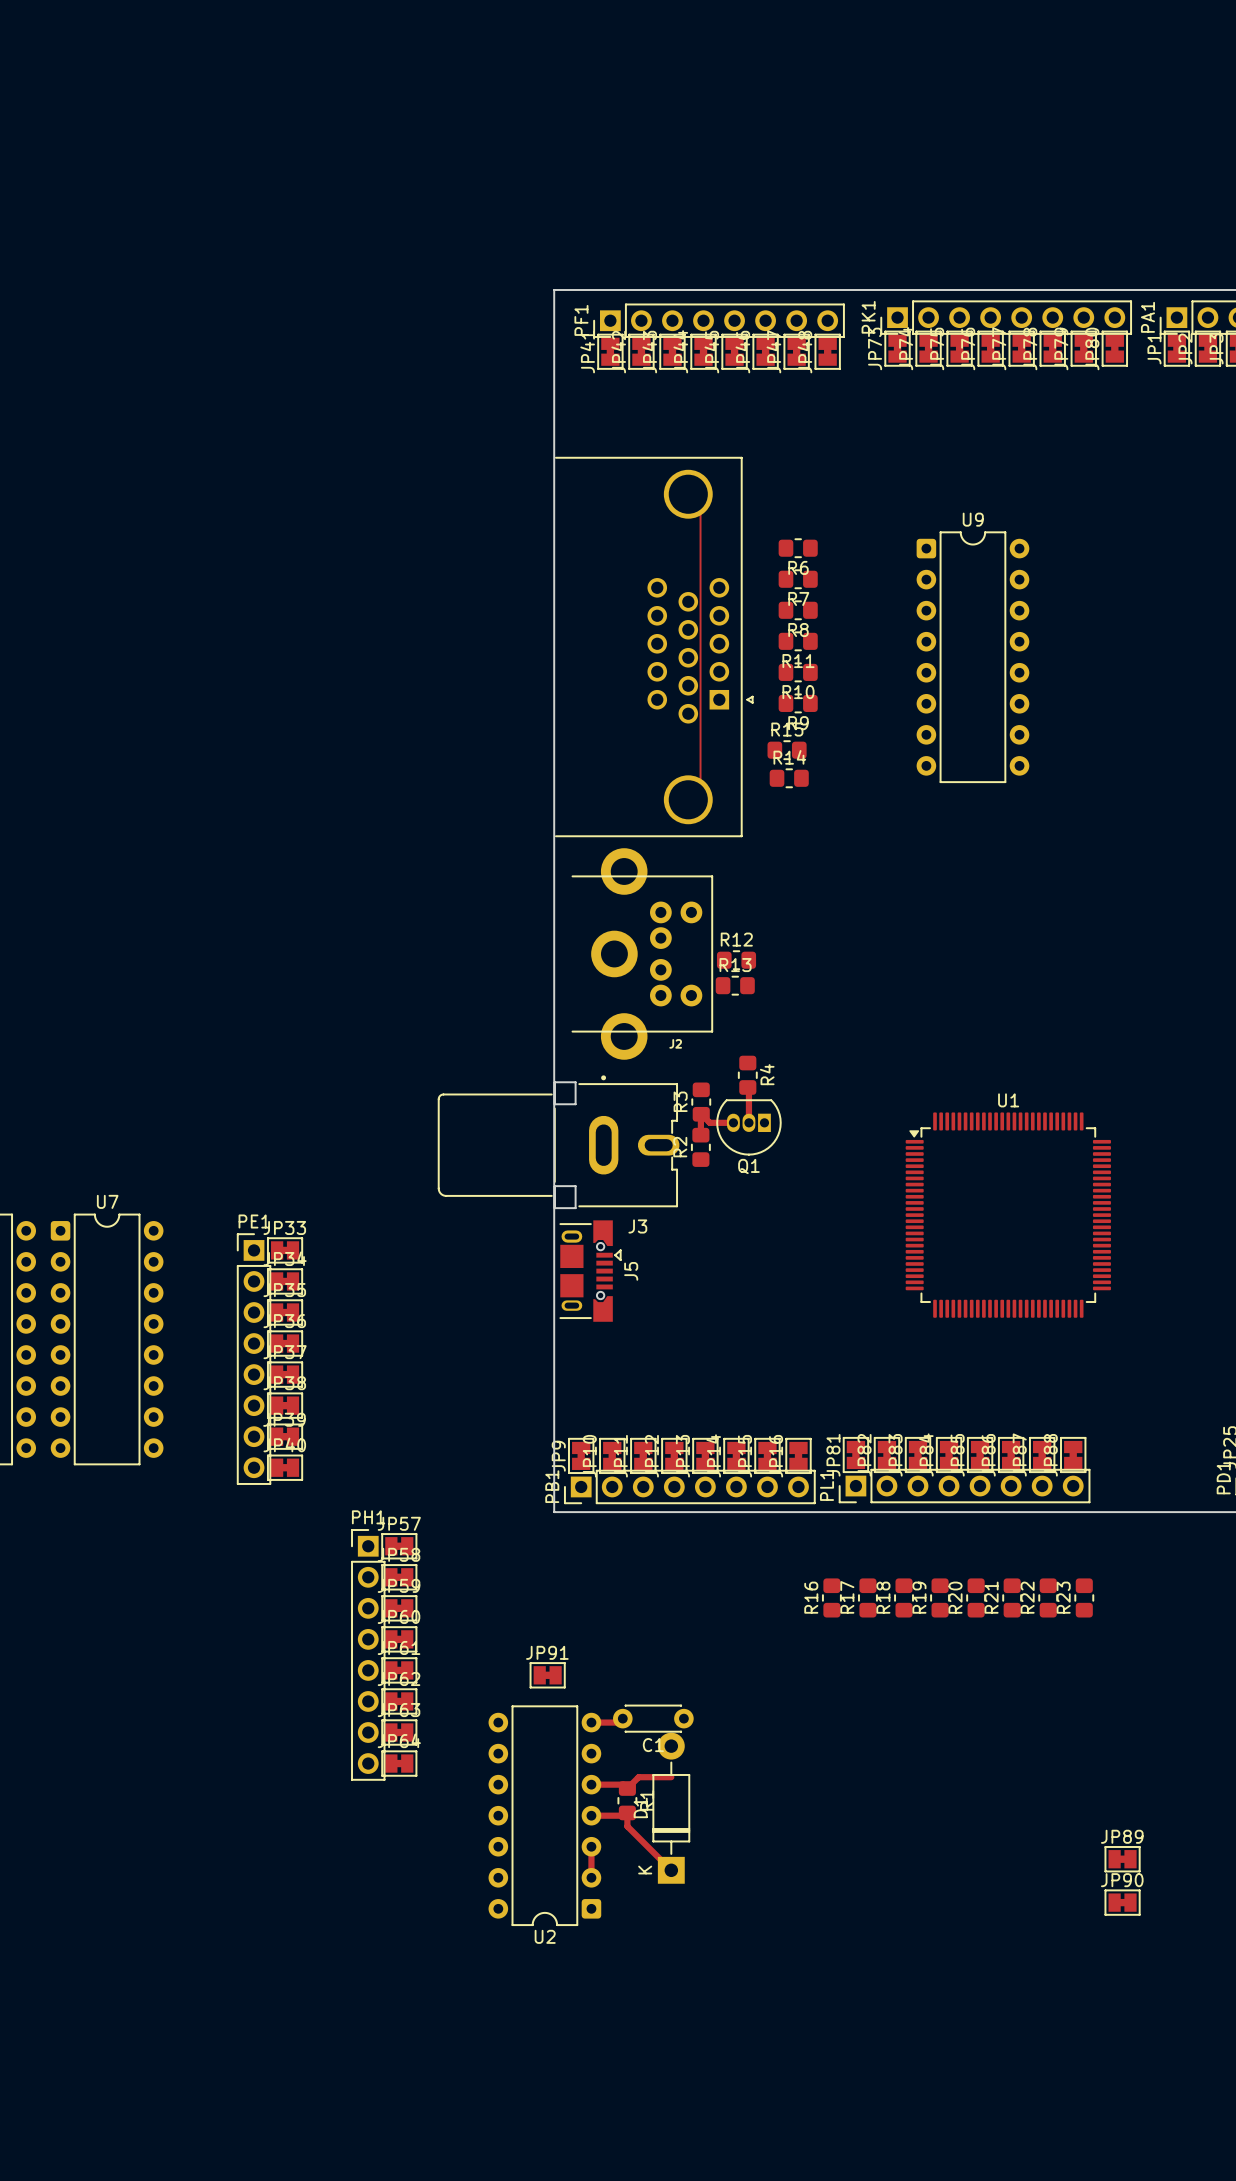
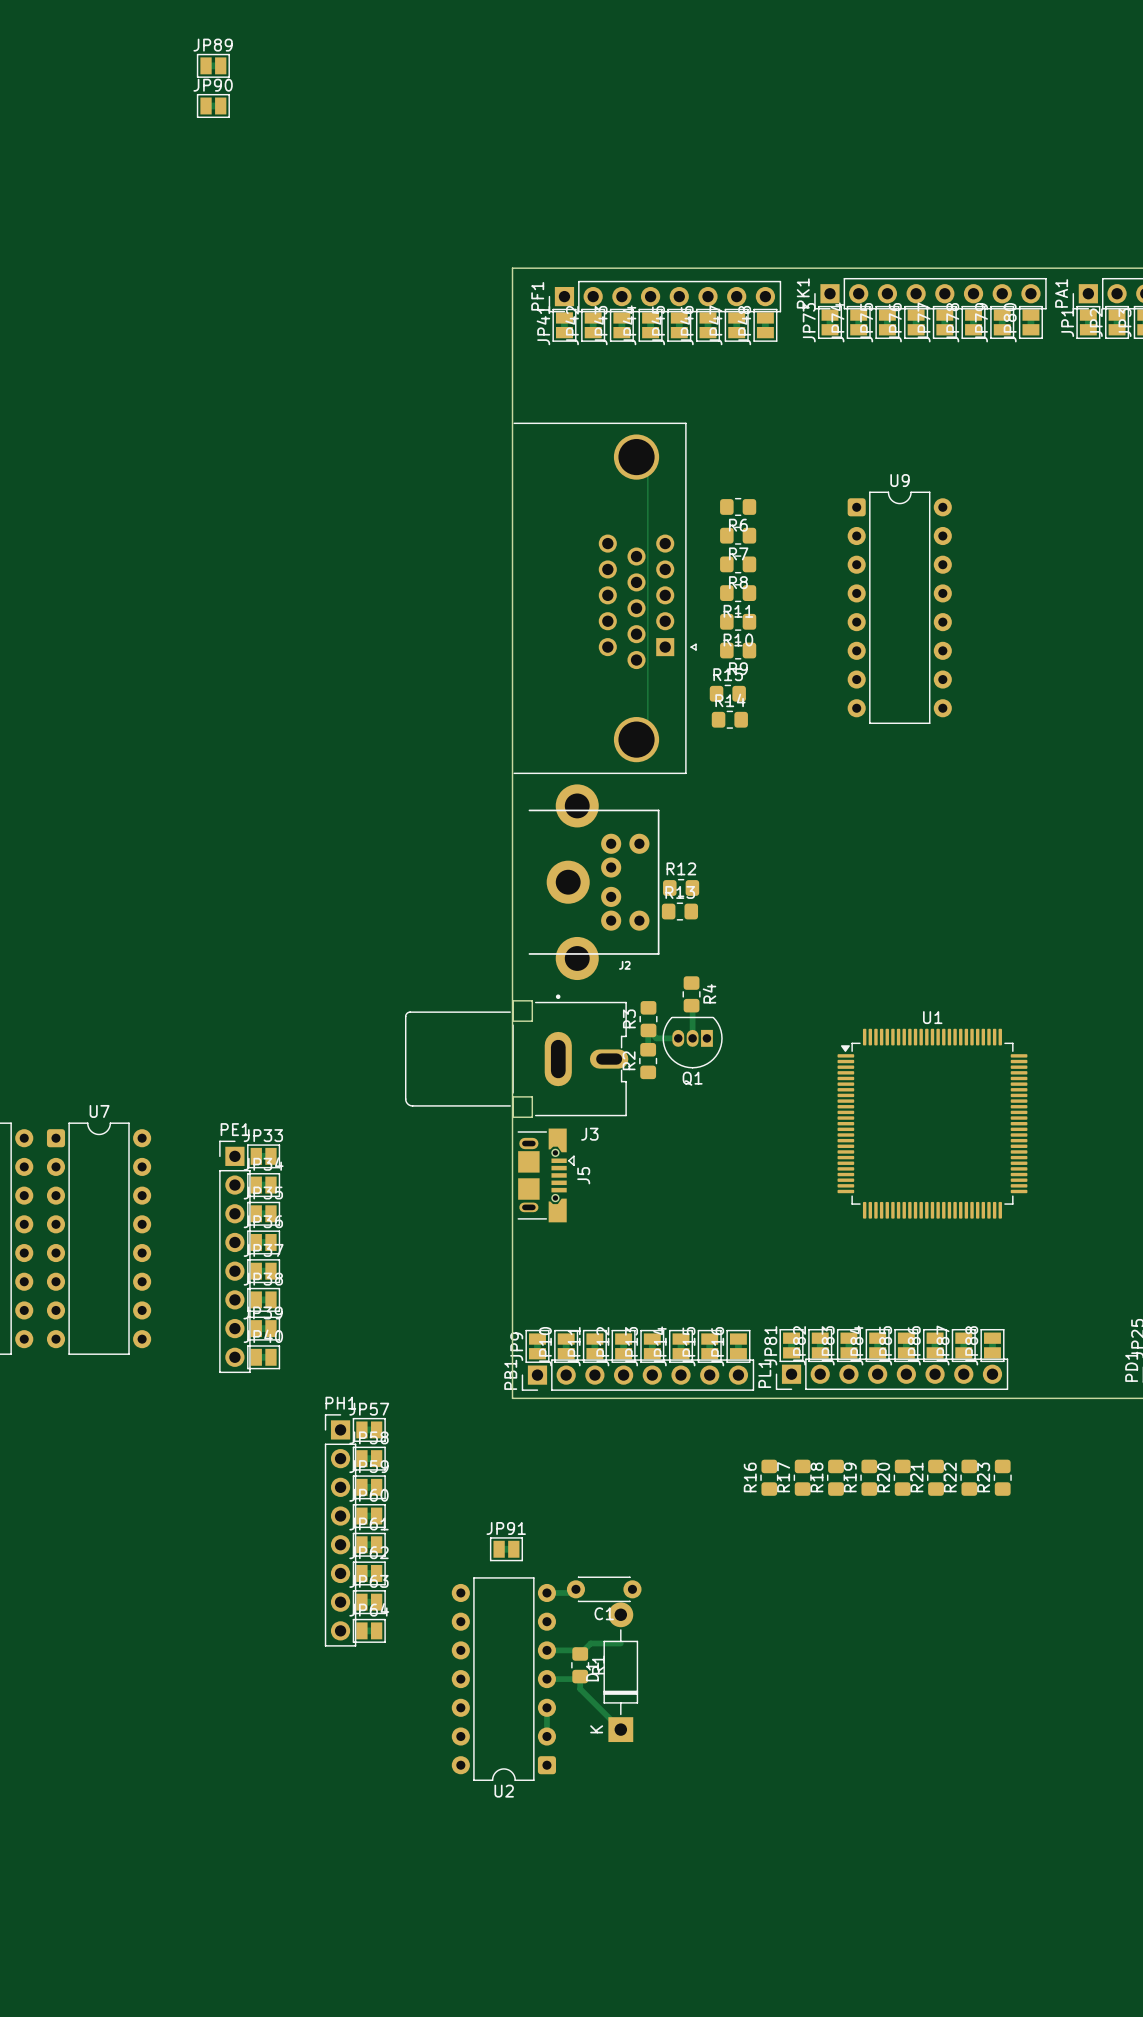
JP89 position: (1122, 1859) -> (213, 65)
JP90 position: (1122, 1902) -> (213, 105)

